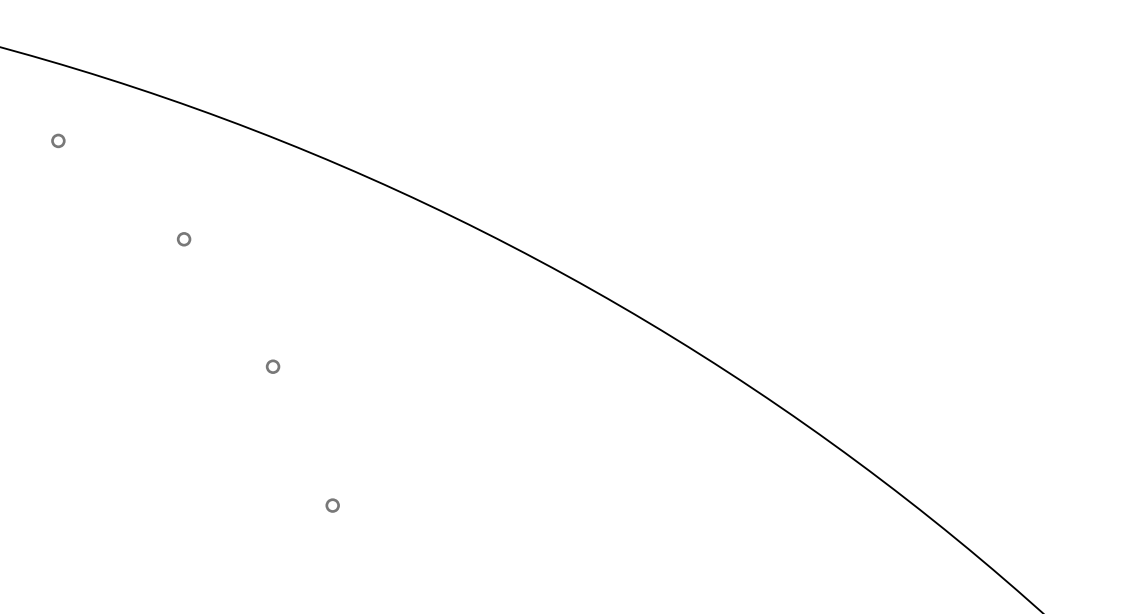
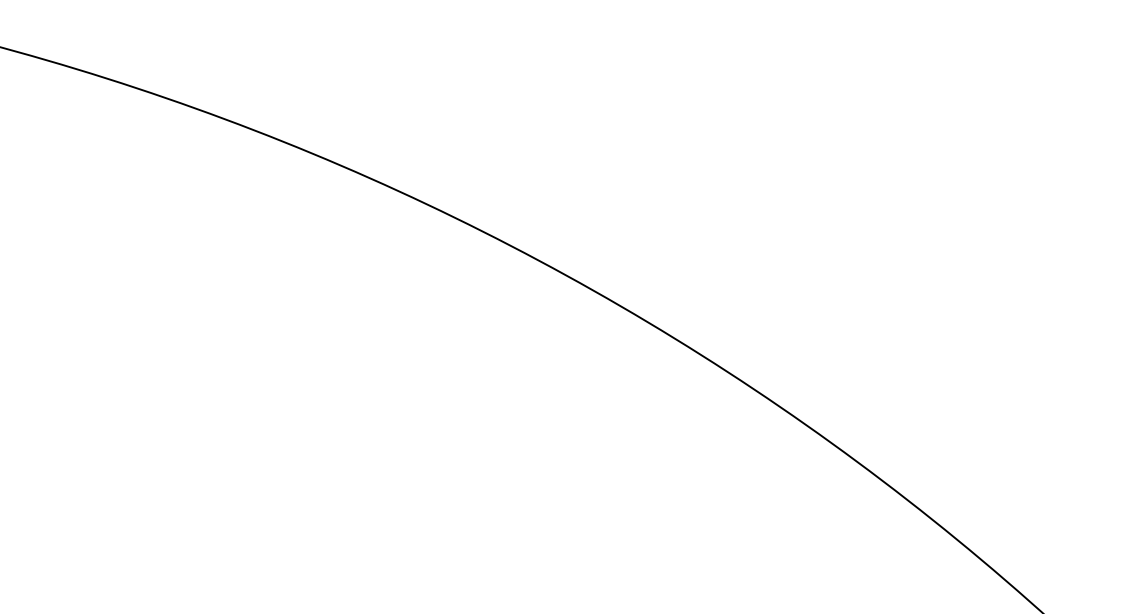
via: (58, 140) -> none
via: (184, 239) -> none
via: (273, 366) -> none
via: (332, 505) -> none

